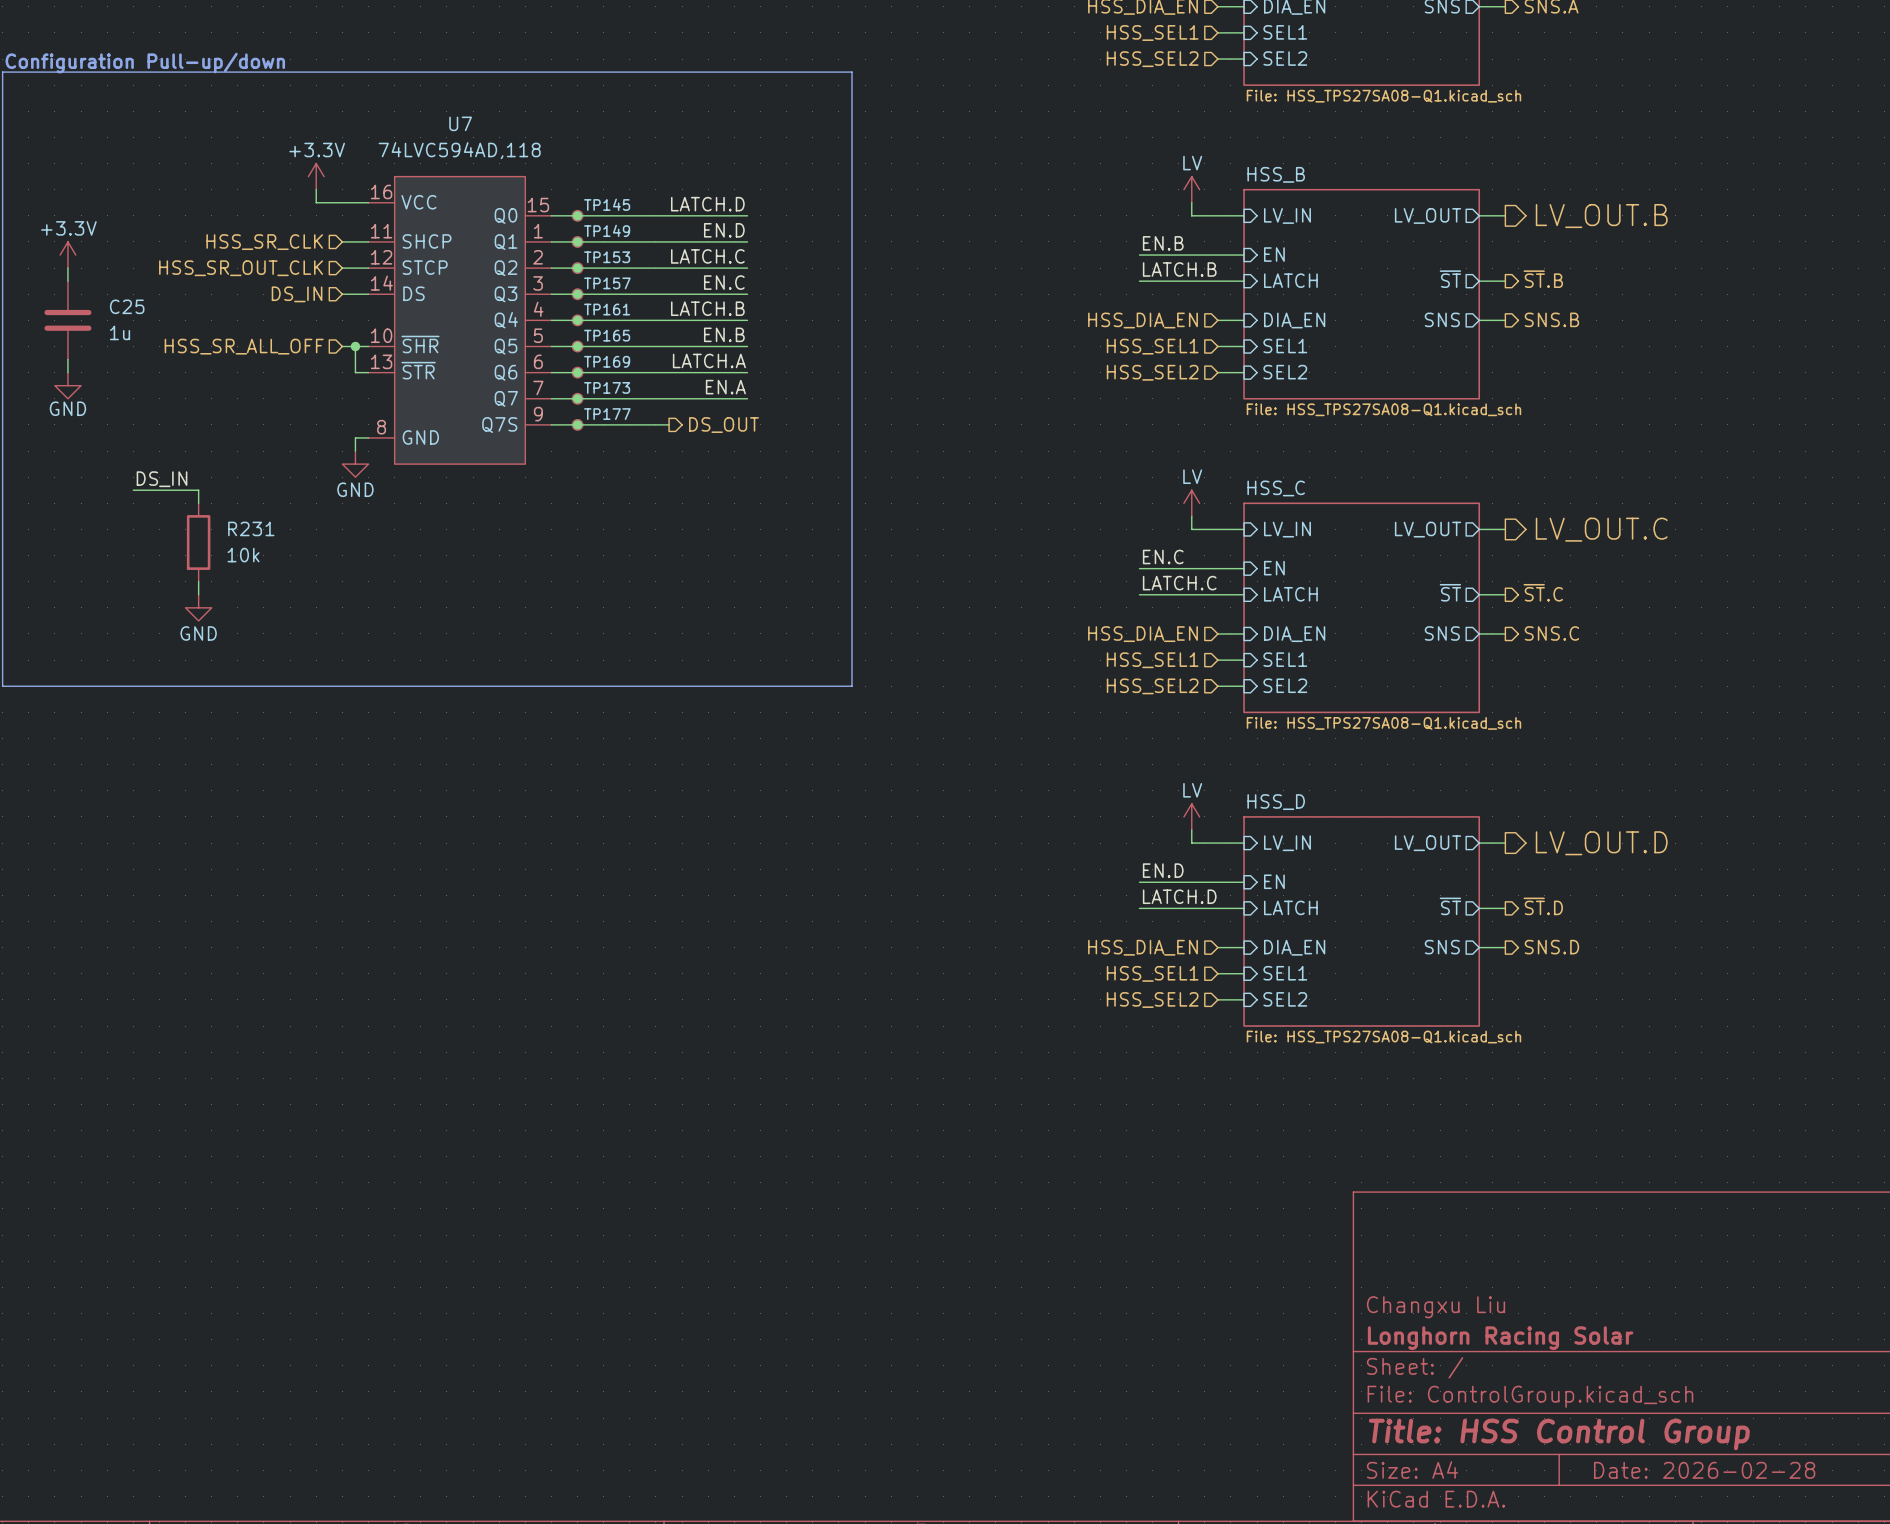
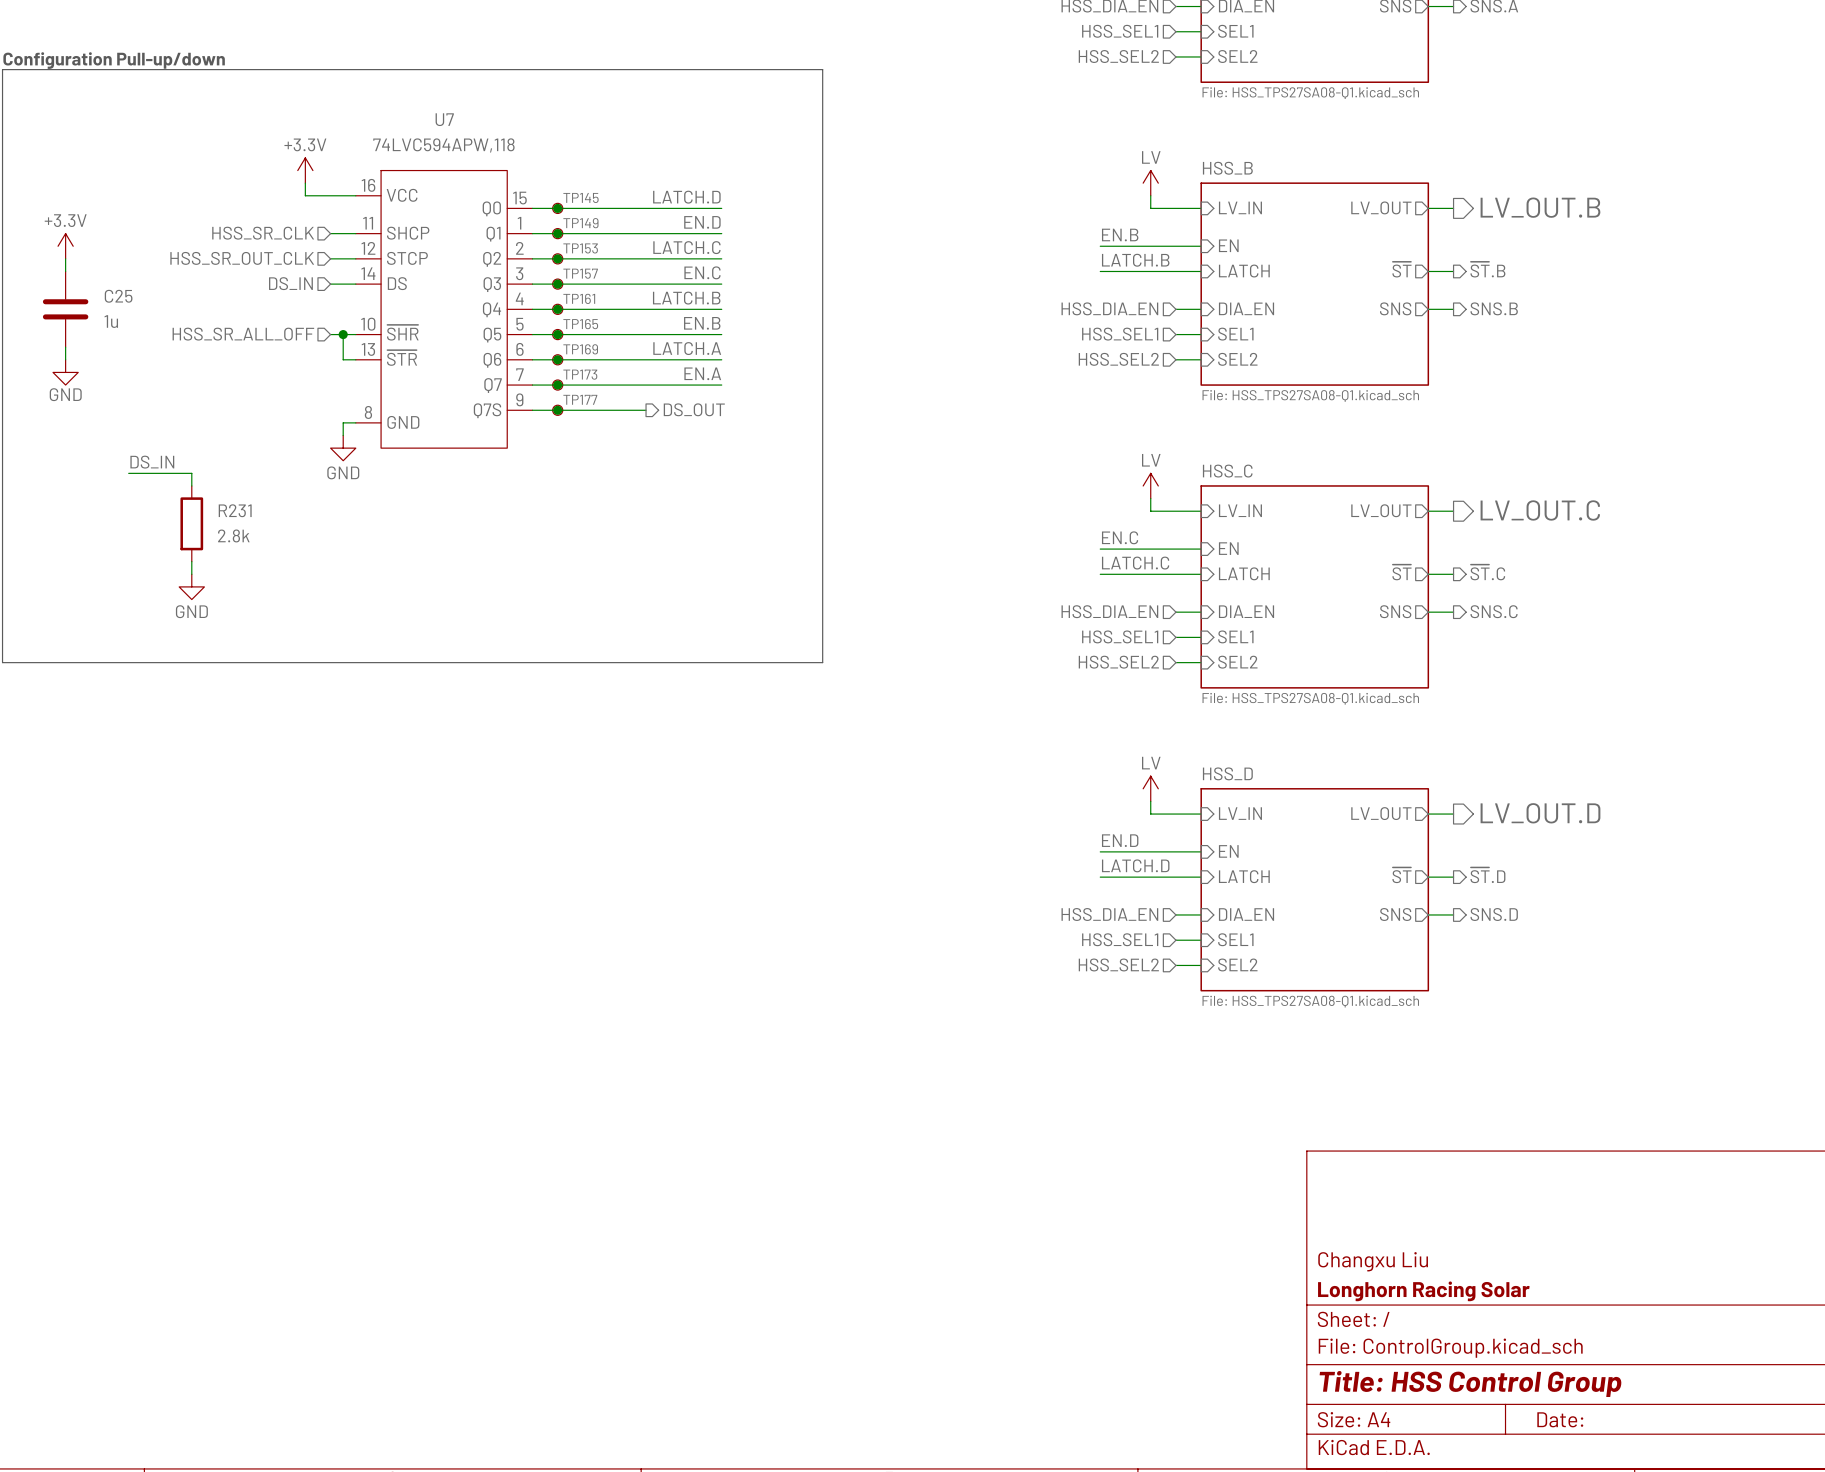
U7 value: 74LVC594AD,118 (459, 150) -> 74LVC594APW,118 (443, 145)
R231 value: 10k (243, 555) -> 2.8k (233, 535)
title block: Date: 2026-02-28 (1704, 1470) -> Date: (1560, 1419)

